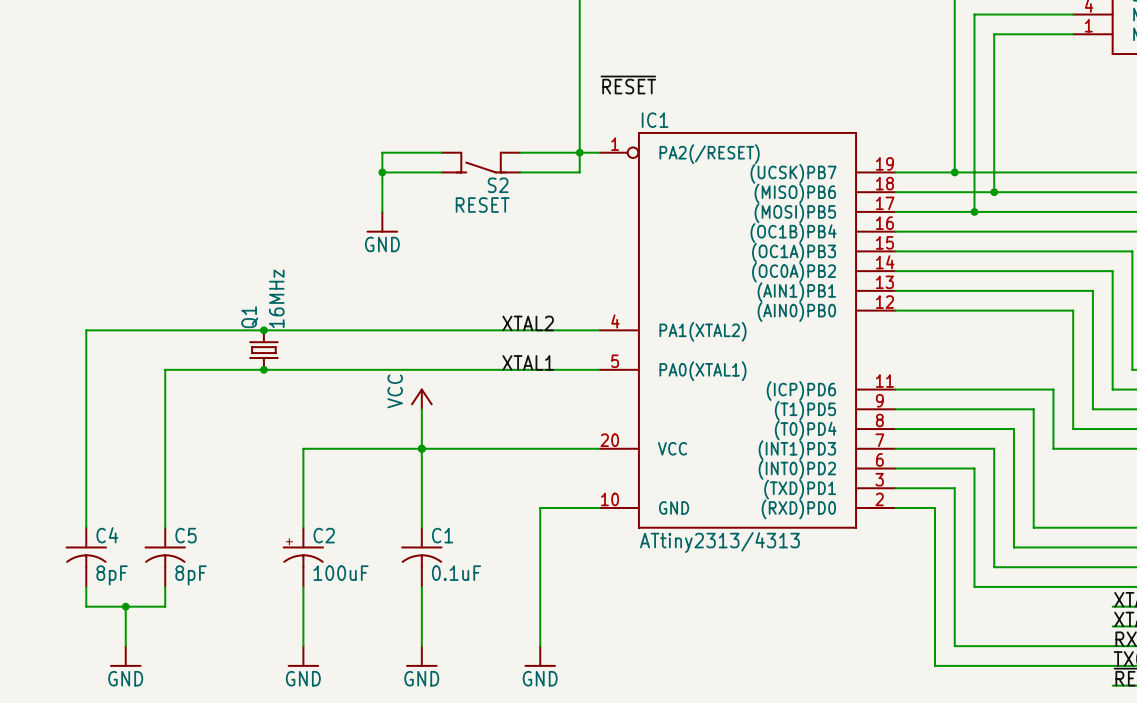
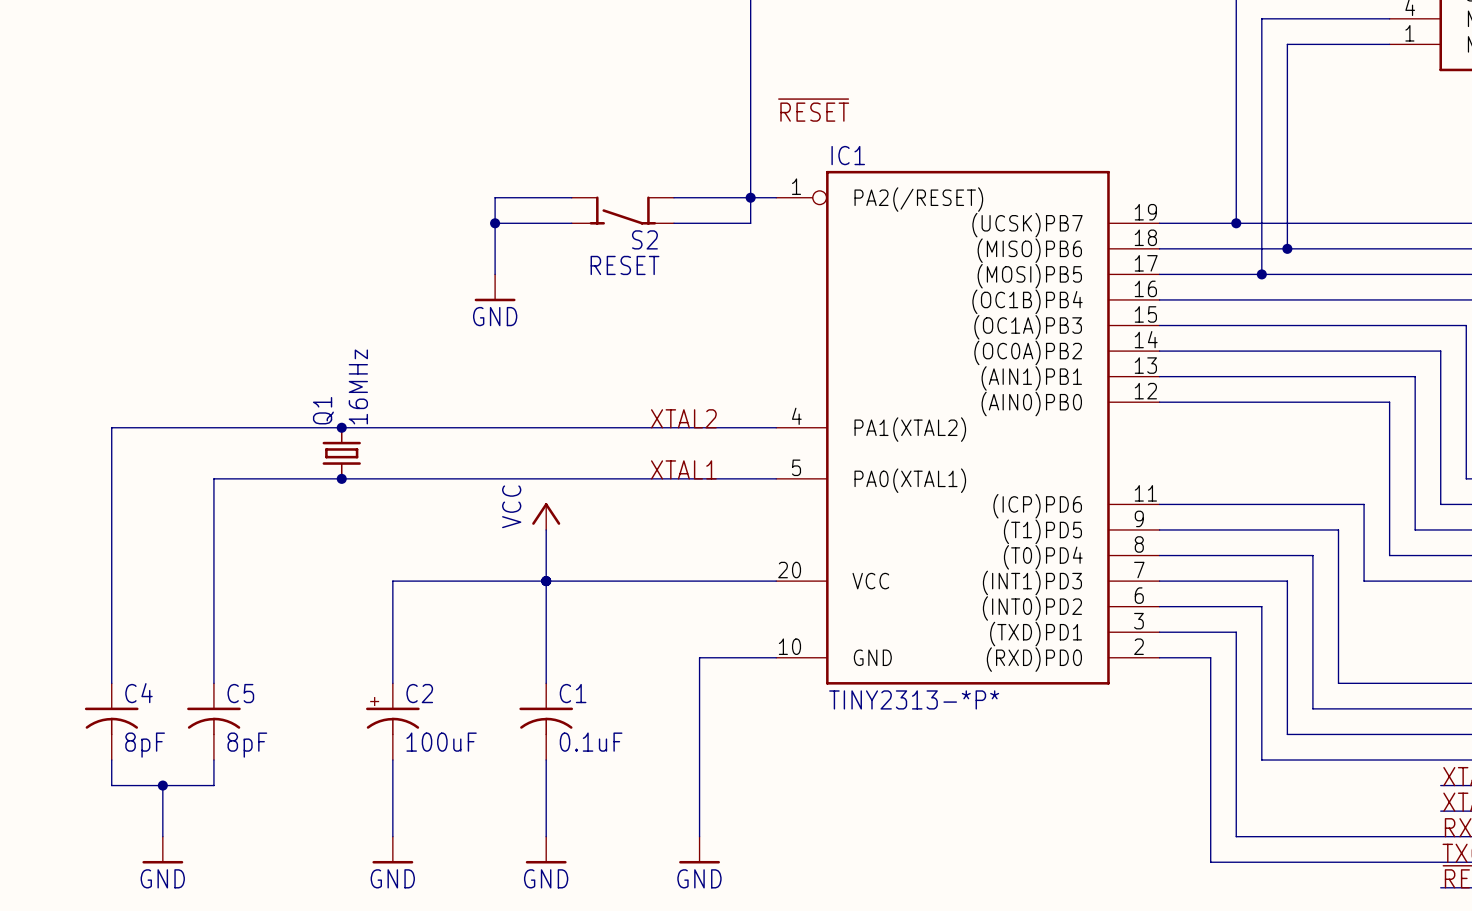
IC1 value: ATtiny2313/4313 (719, 542) -> TINY2313-*P* (914, 699)

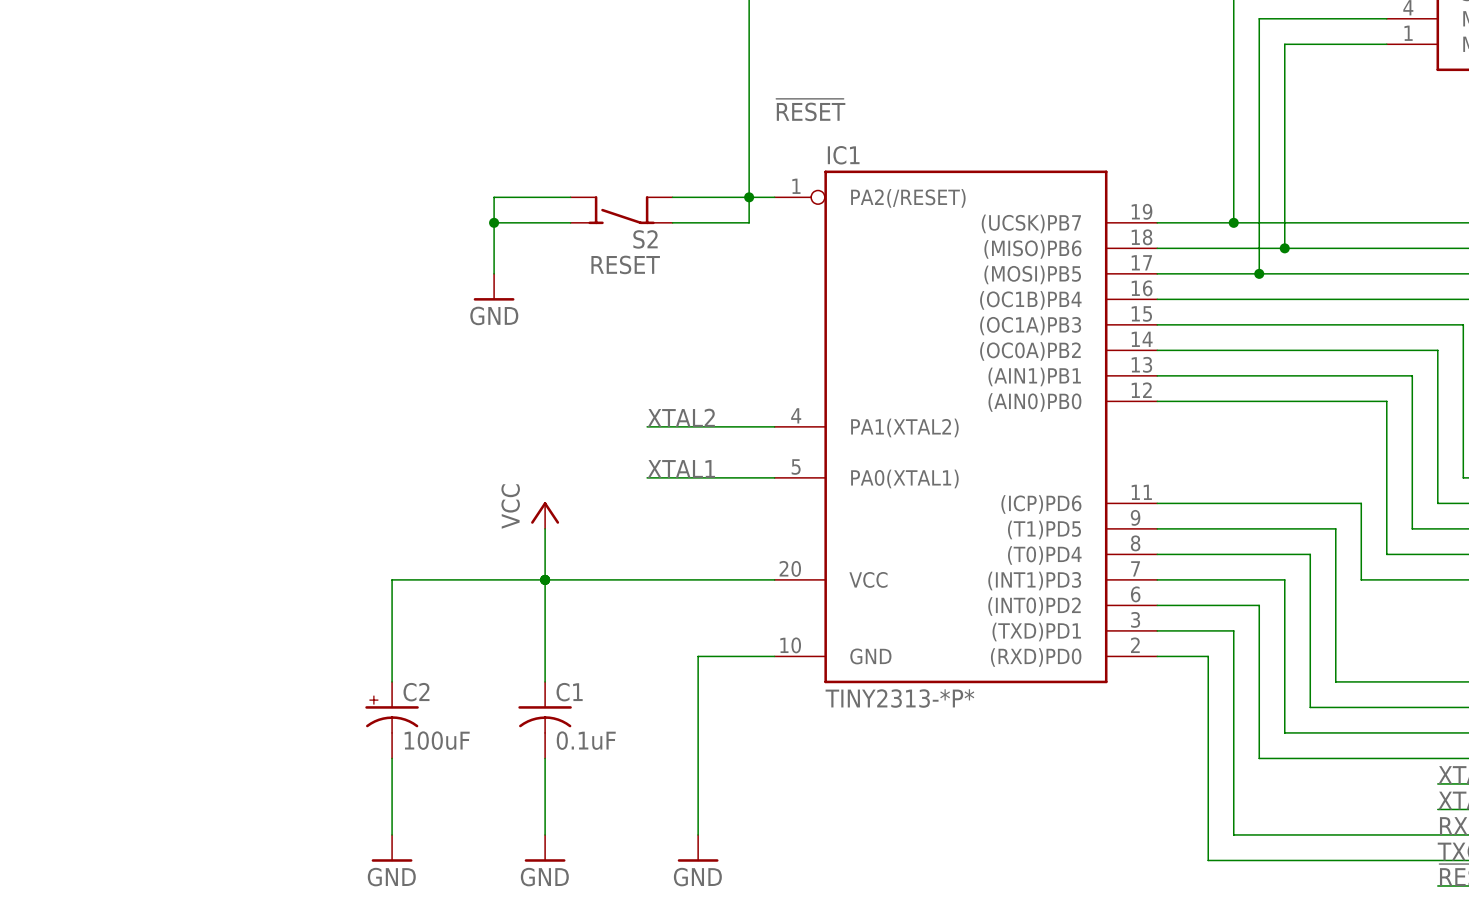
junction: (341, 427) -> none
wire: (648, 427) (111, 427) (111, 683) -> none
Q1: 16MHz (341, 453) -> none
junction: (341, 478) -> none
wire: (648, 478) (213, 478) (213, 683) -> none
C4: 8pF (111, 721) -> none
C5: 8pF (213, 721) -> none
wire: (111, 760) (111, 785) (213, 785) (213, 760) -> none
wire: (162, 785) (162, 836) -> none
junction: (162, 785) -> none
power symbol: GND (162, 850) -> none

